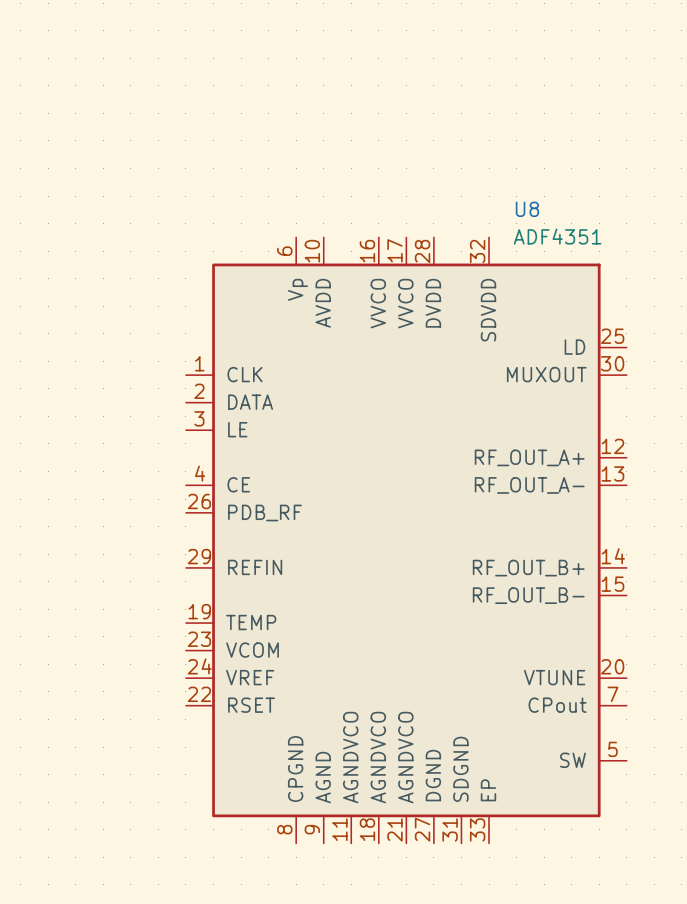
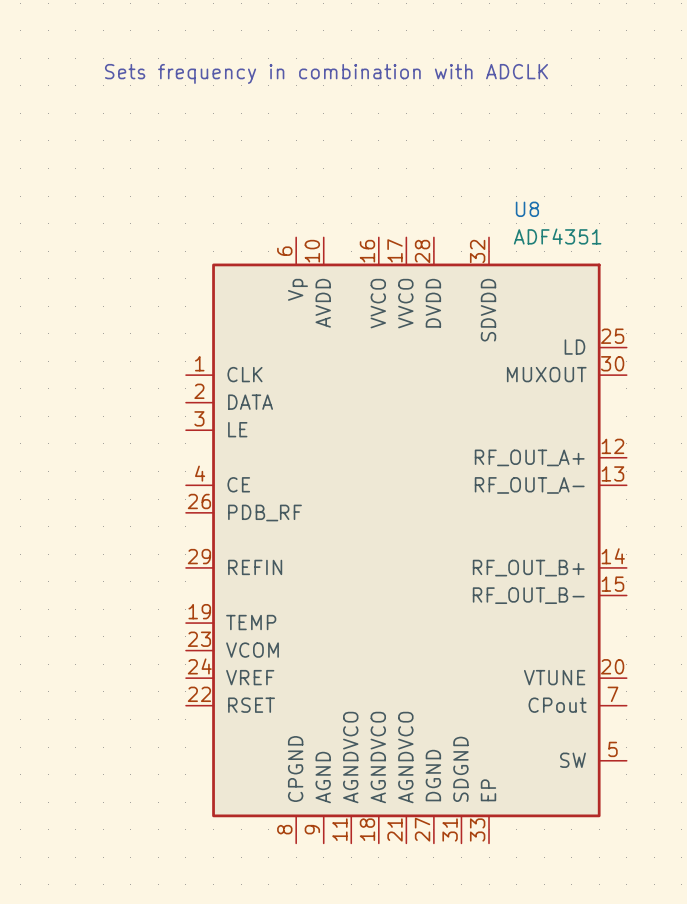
text: none -> Sets frequency in combination with ADCLK (326, 73)

